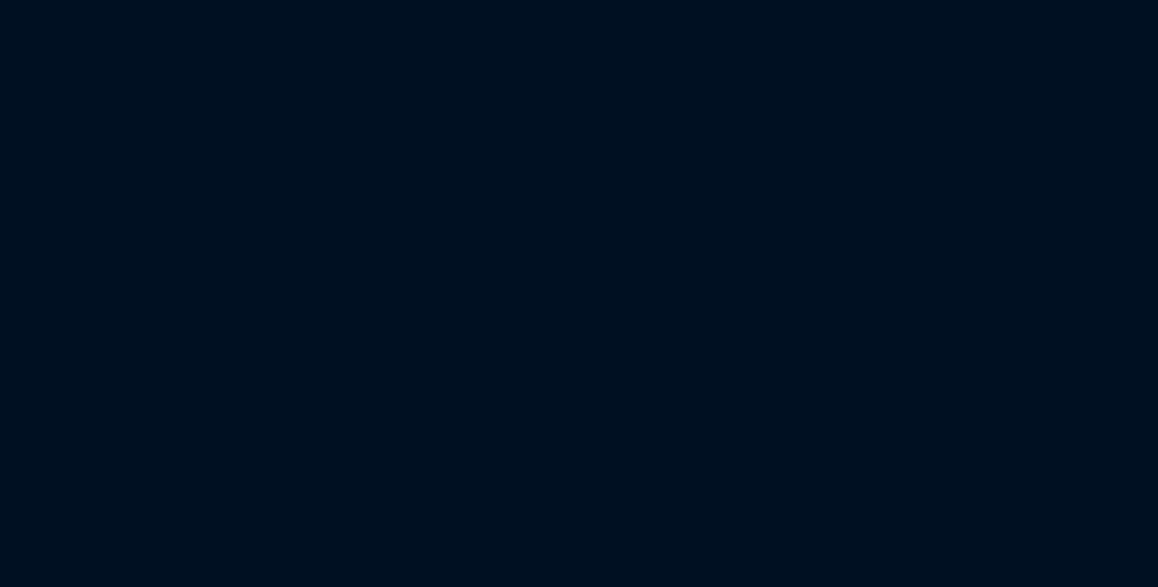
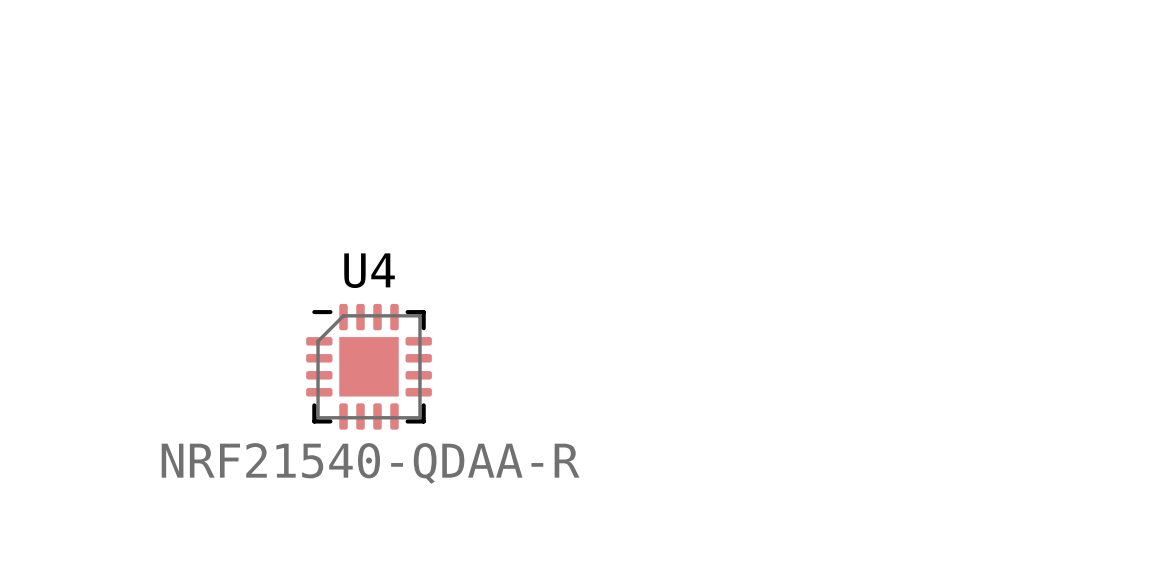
U4: none -> NRF21540-QDAA-R (369, 366)

